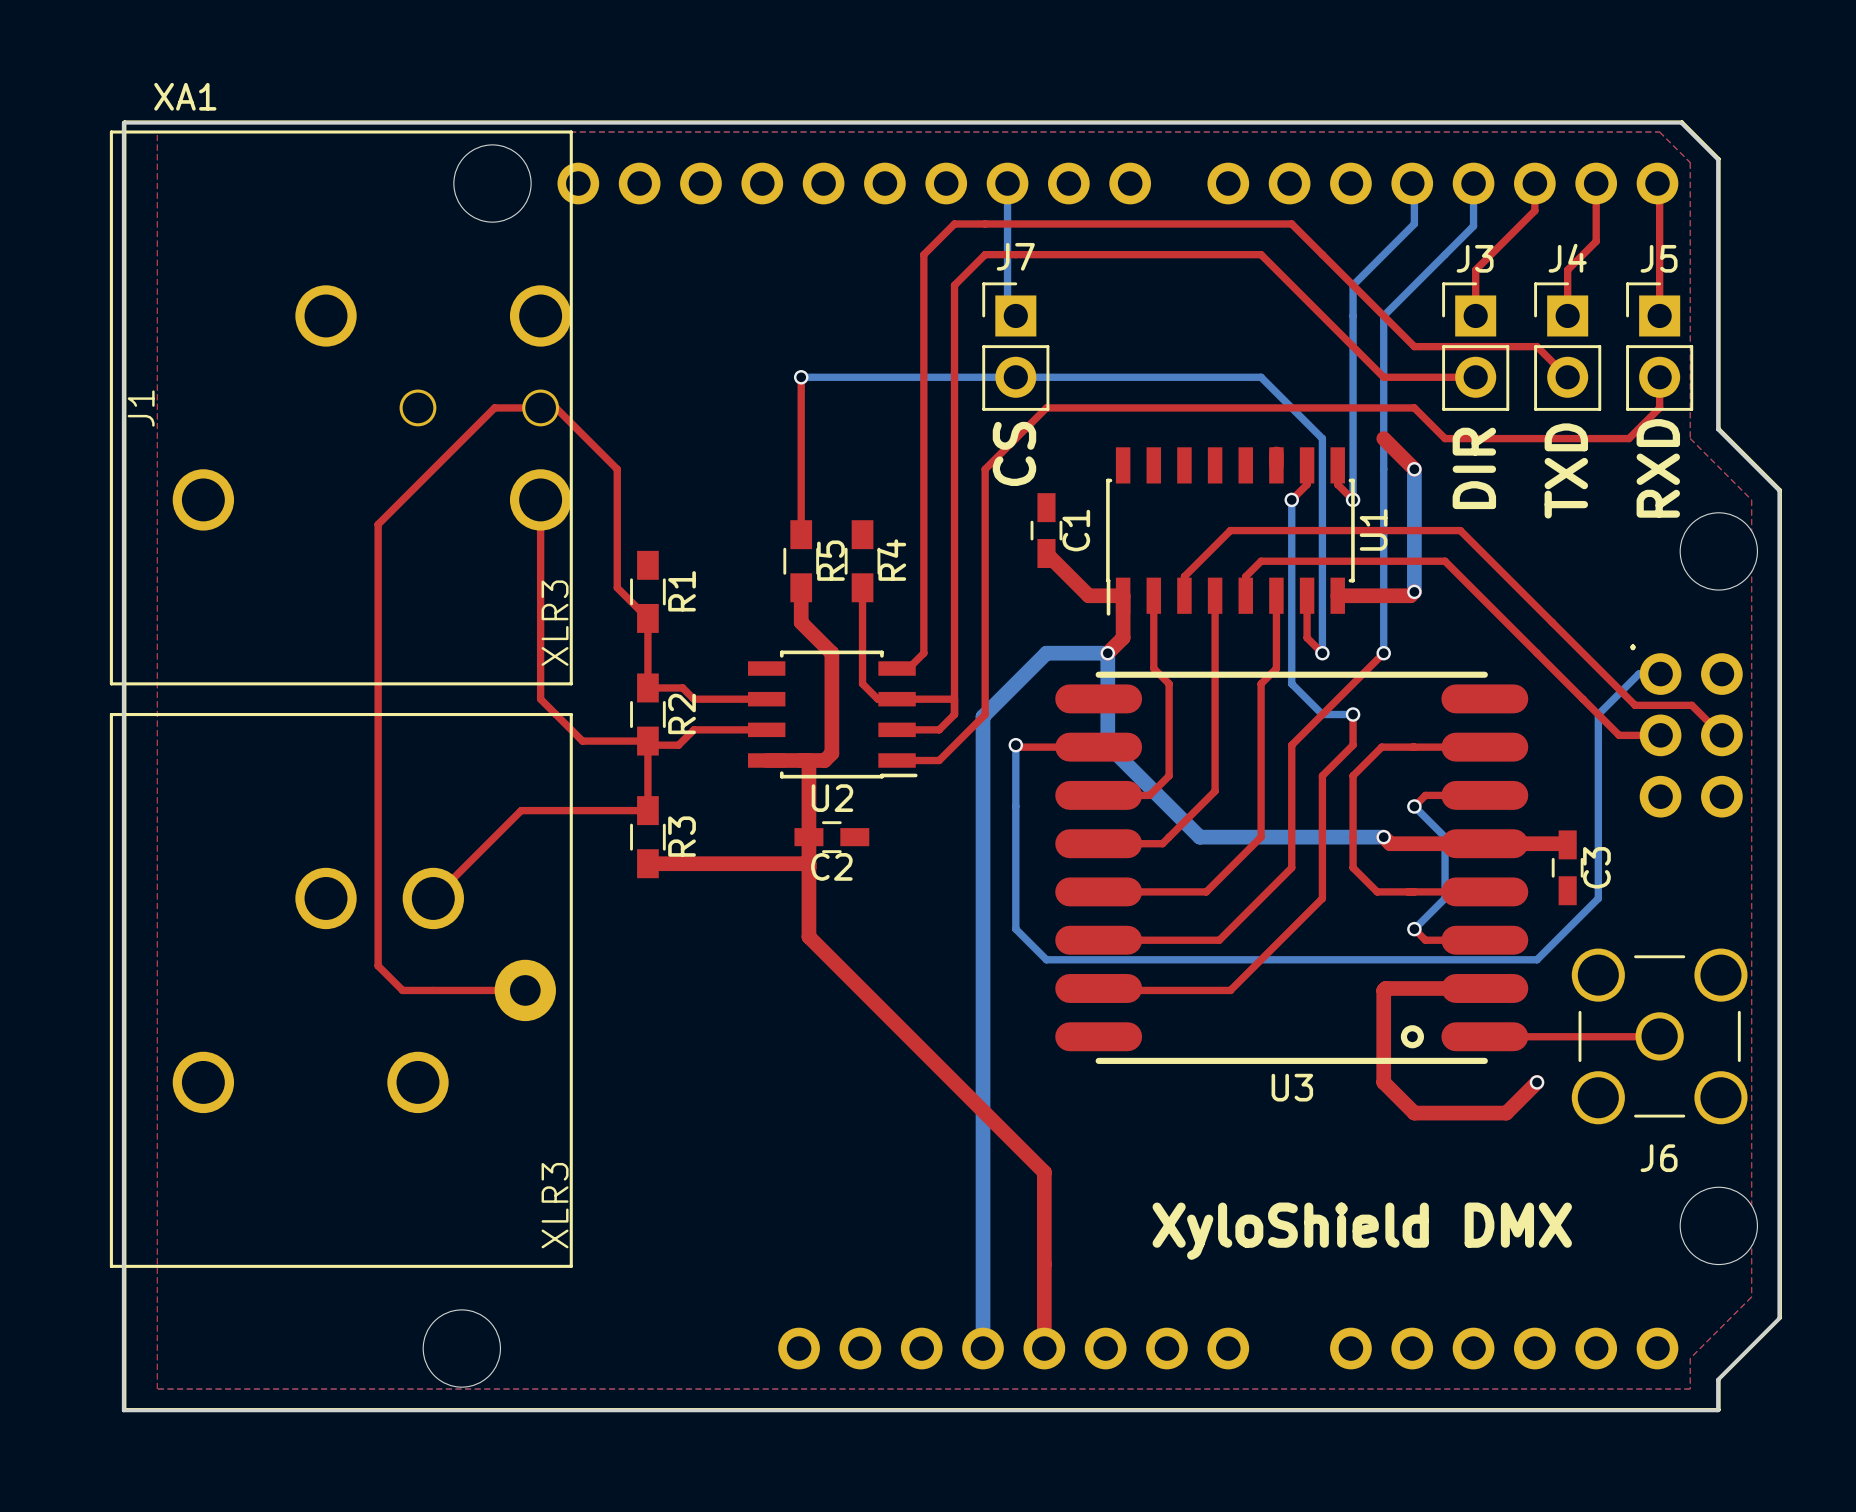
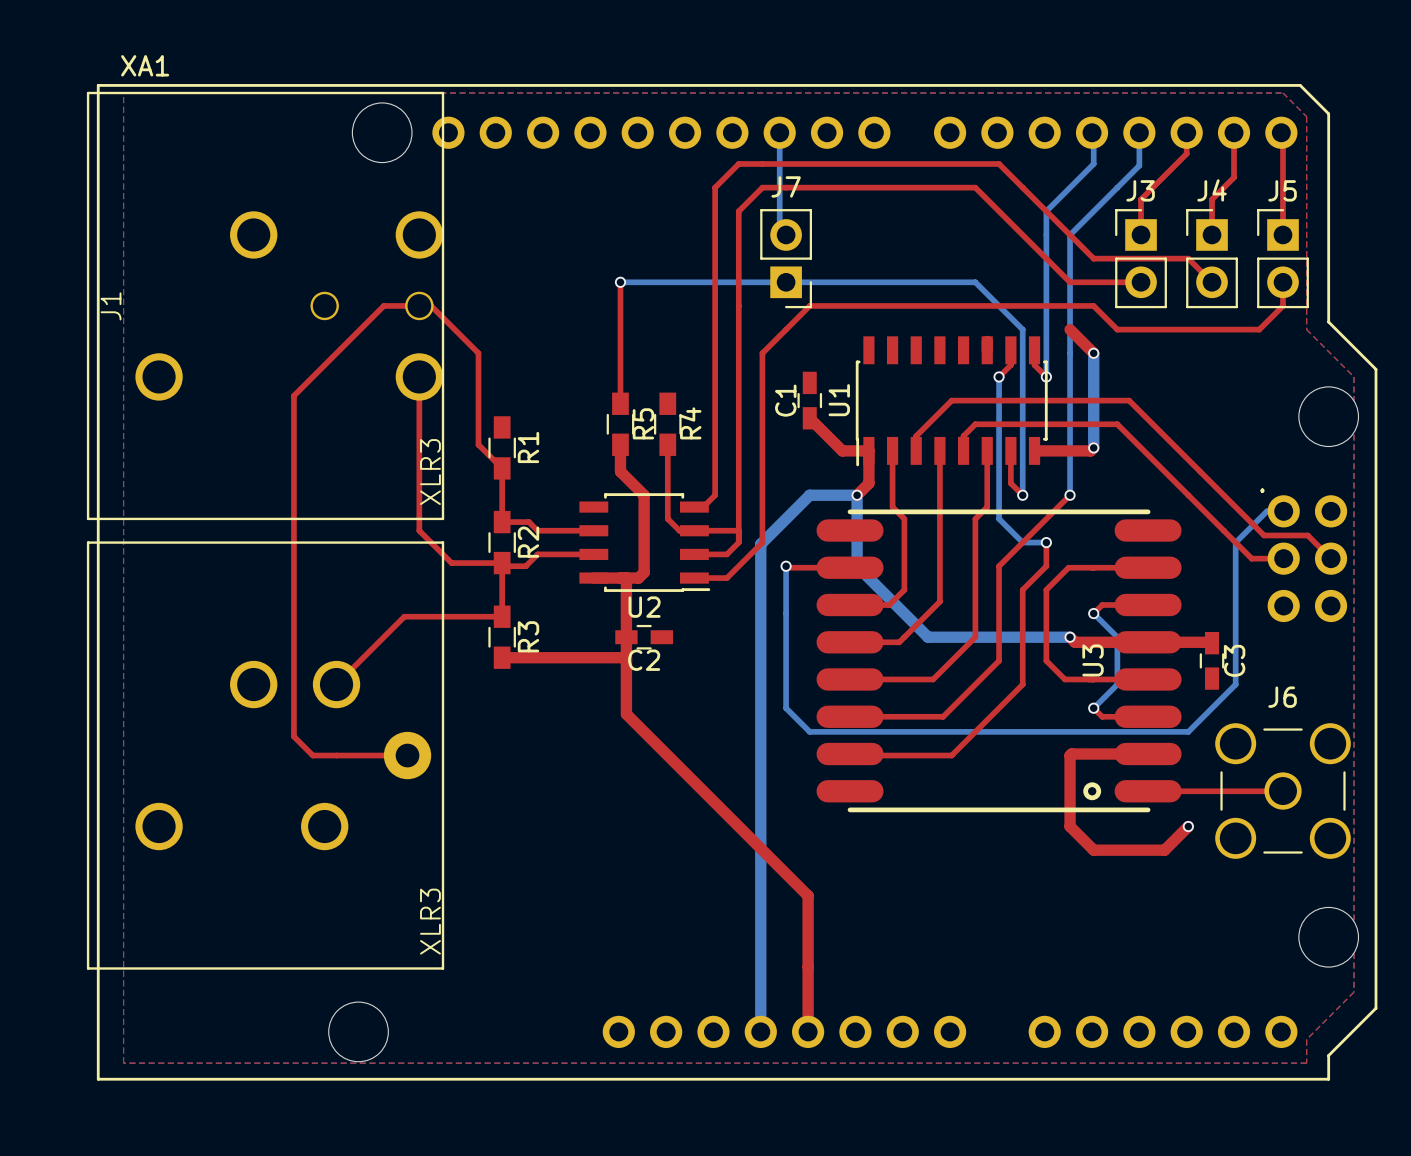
board edge: (123, 122) (123, 1410) (1717, 1410) (1717, 1379) (1779, 1318) (1779, 490) (1717, 429) (1717, 159) (1681, 122) (123, 122) -> none
J7 rotation: 0° (1015, 346) -> 180° (786, 258)
text: CS (1014, 453) -> none
text: DIR (1474, 468) -> none
text: RXD (1658, 468) -> none
text: TXD (1566, 470) -> none
U1 name position: U1 (1373, 529) -> U1 (839, 400)
C1 name position: C1 (1076, 530) -> C1 (785, 400)
U3 name rotation: 0° (1292, 1087) -> 90° counterclockwise (1093, 660)
U3 name position: U3 (1292, 1087) -> U3 (1093, 660)
J6 name position: J6 (1659, 1158) -> J6 (1282, 697)
text: XyloShield DMX (1362, 1231) -> none

